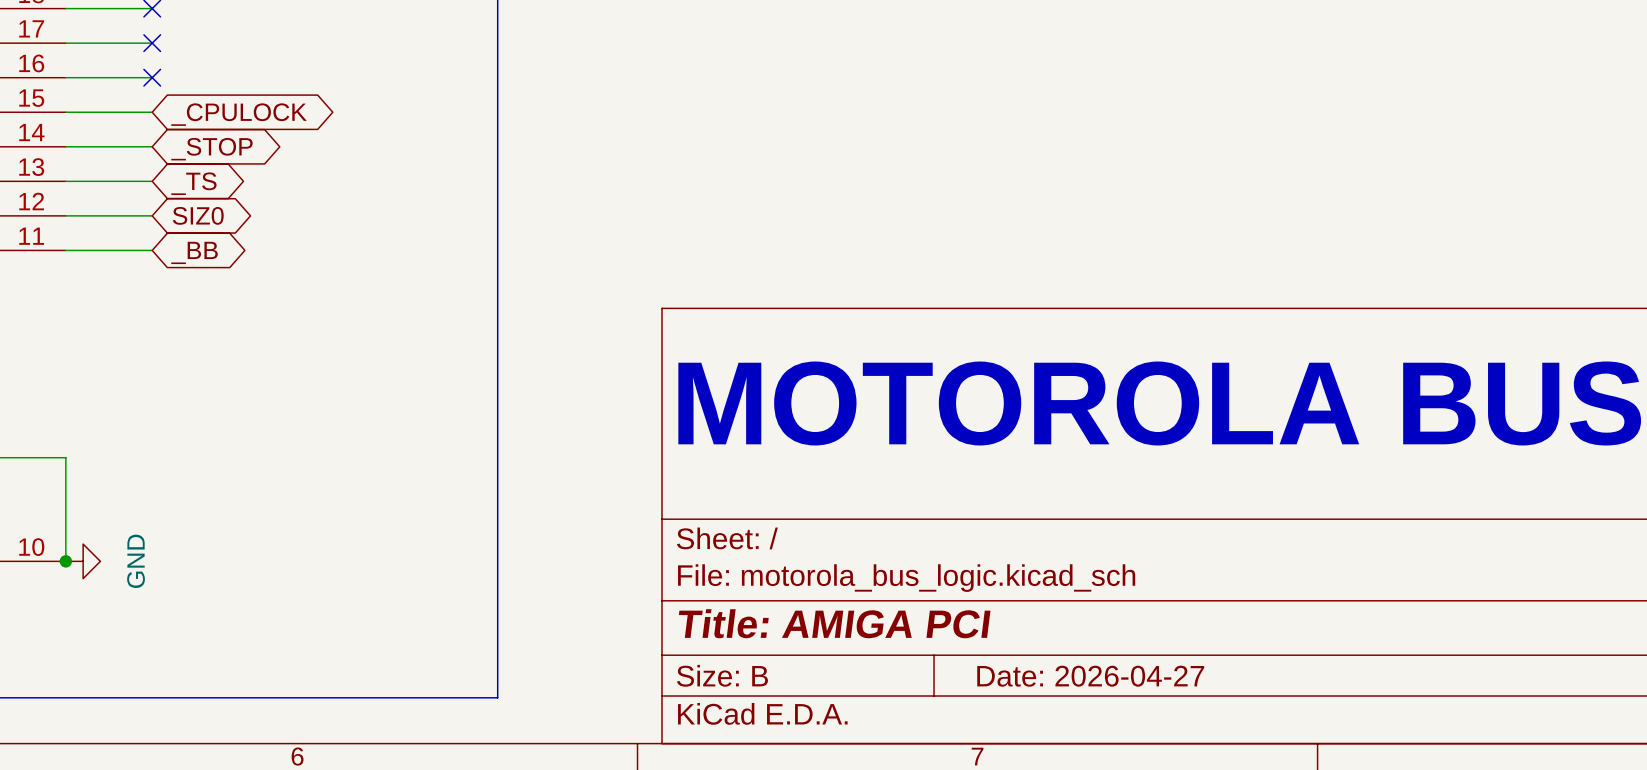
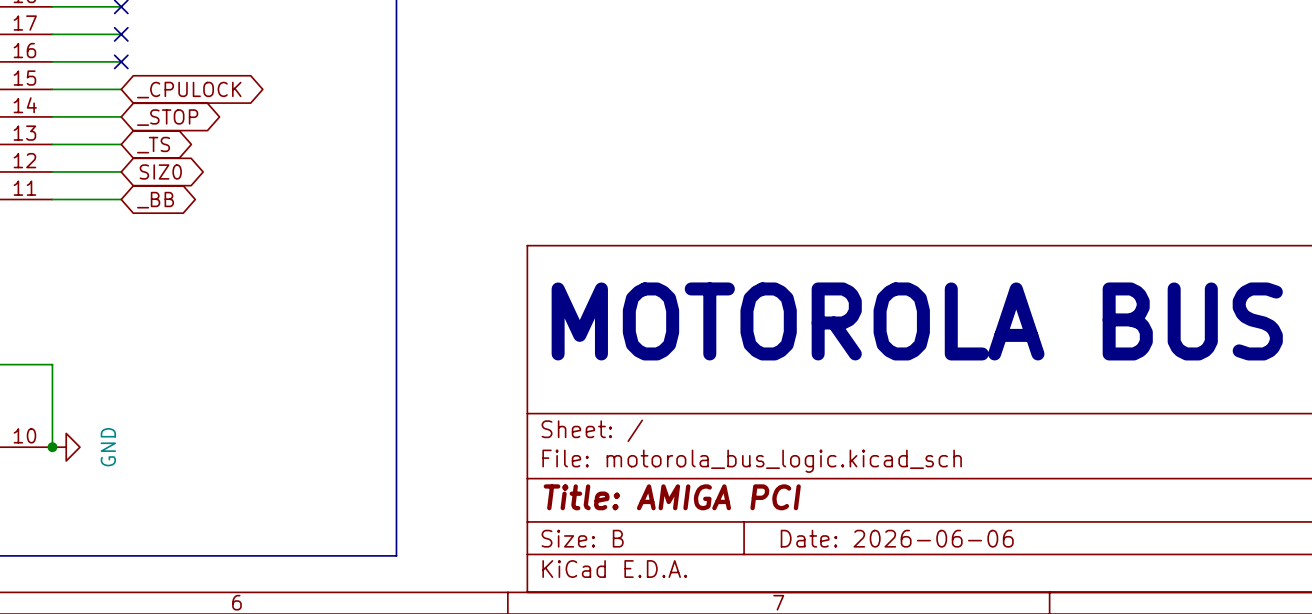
title block: Date: 2026-04-27 (1090, 676) -> Date: 2026-06-06 (897, 538)

